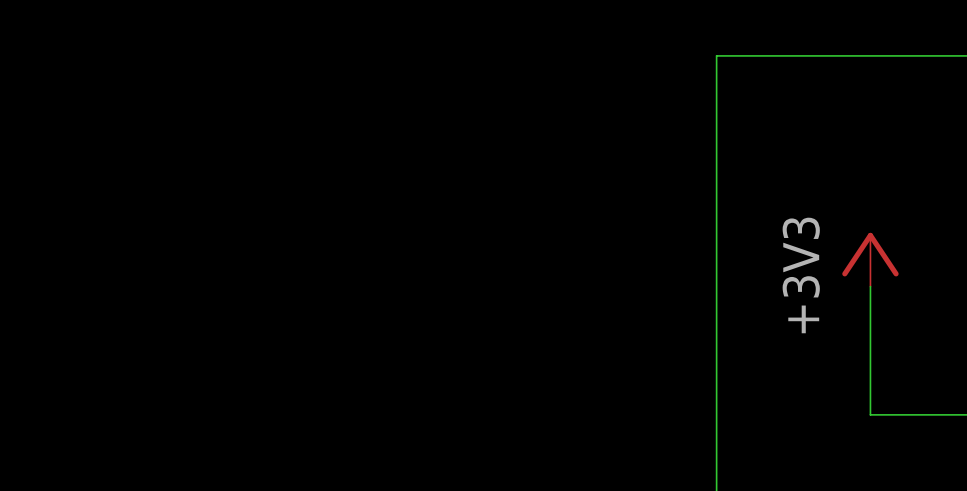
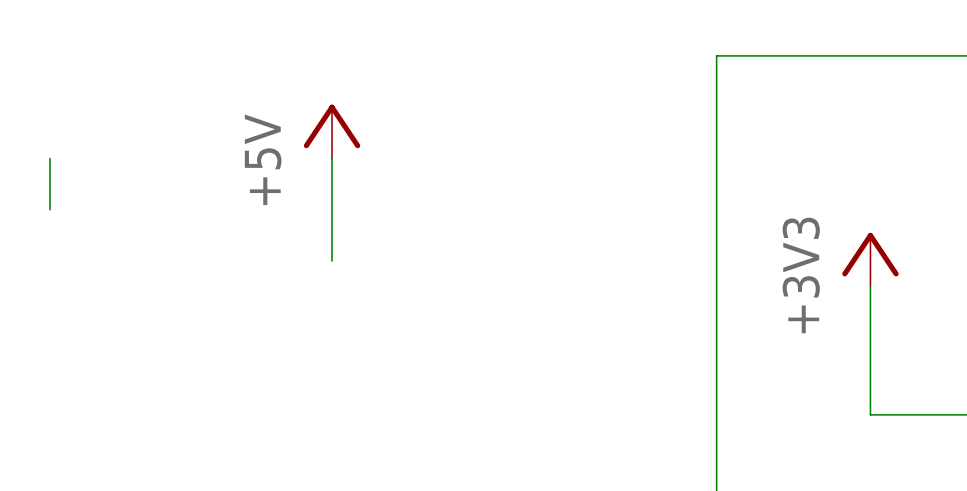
power symbol: none -> +5V (332, 131)
wire: none -> (49, 158) (49, 209)
wire: none -> (332, 158) (332, 261)

